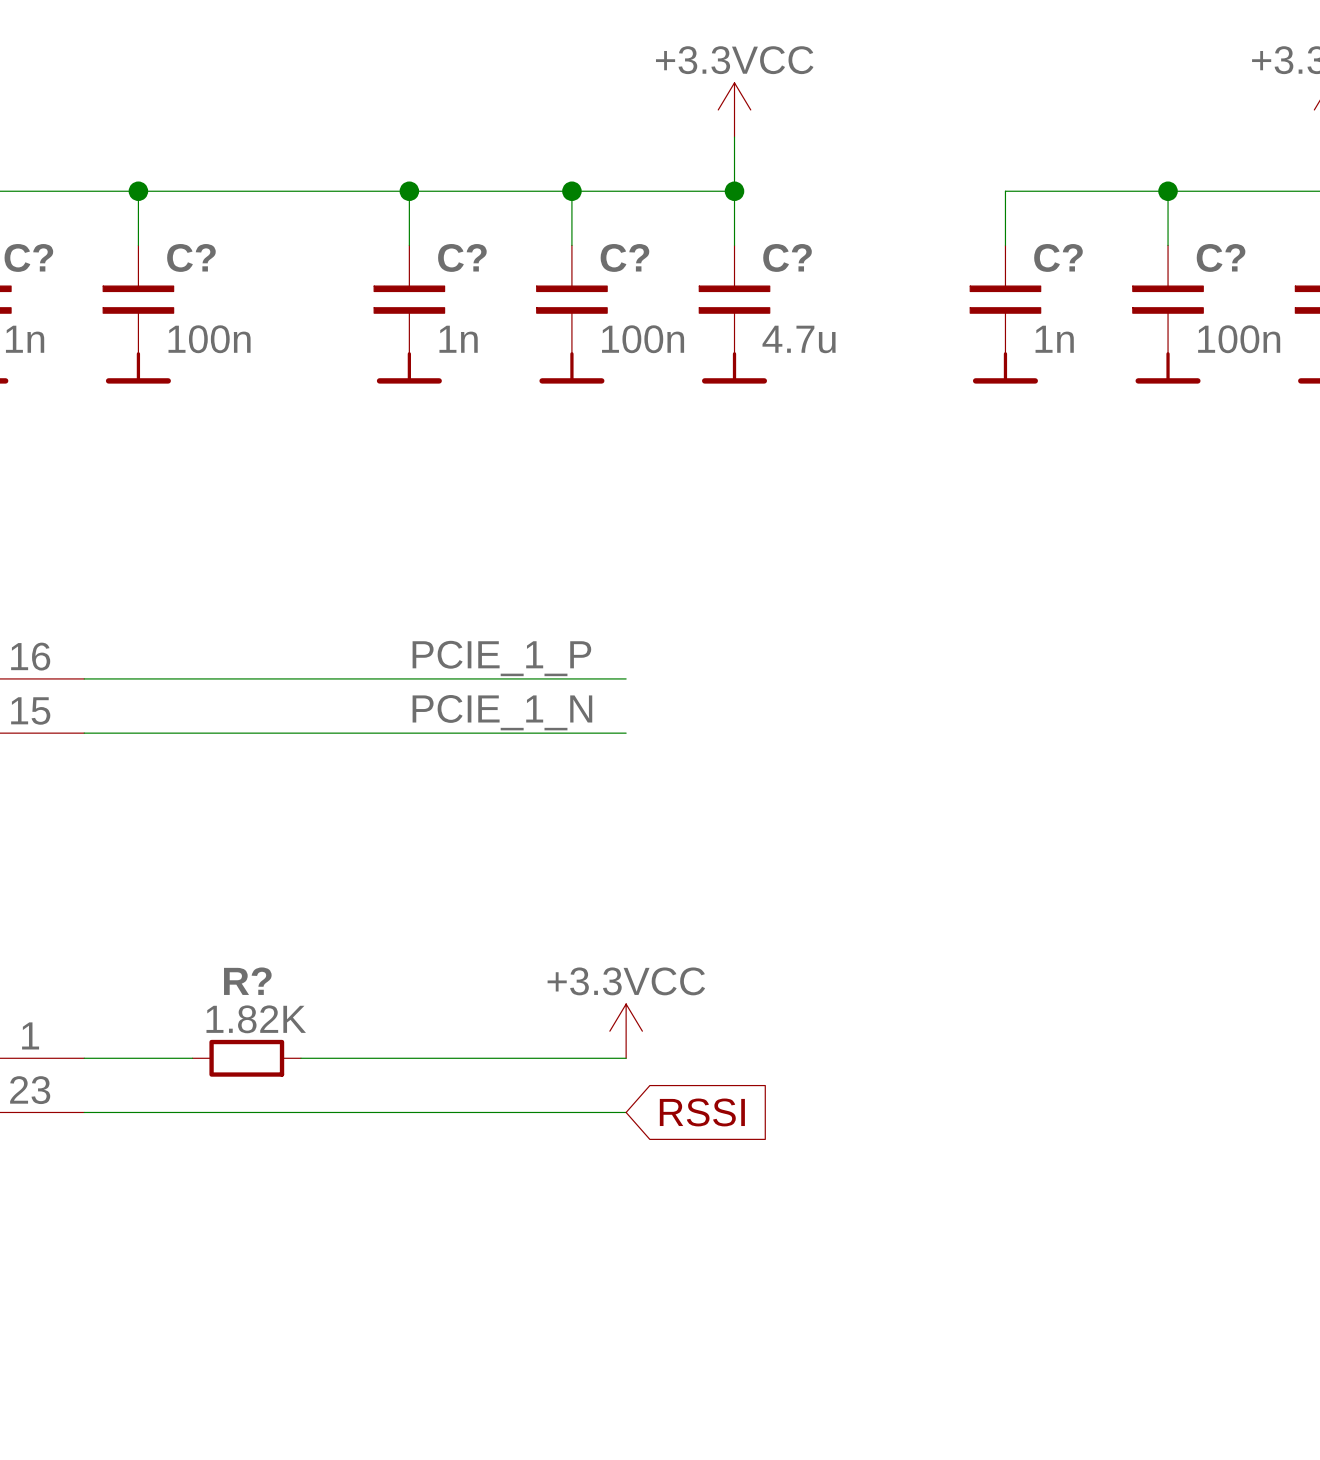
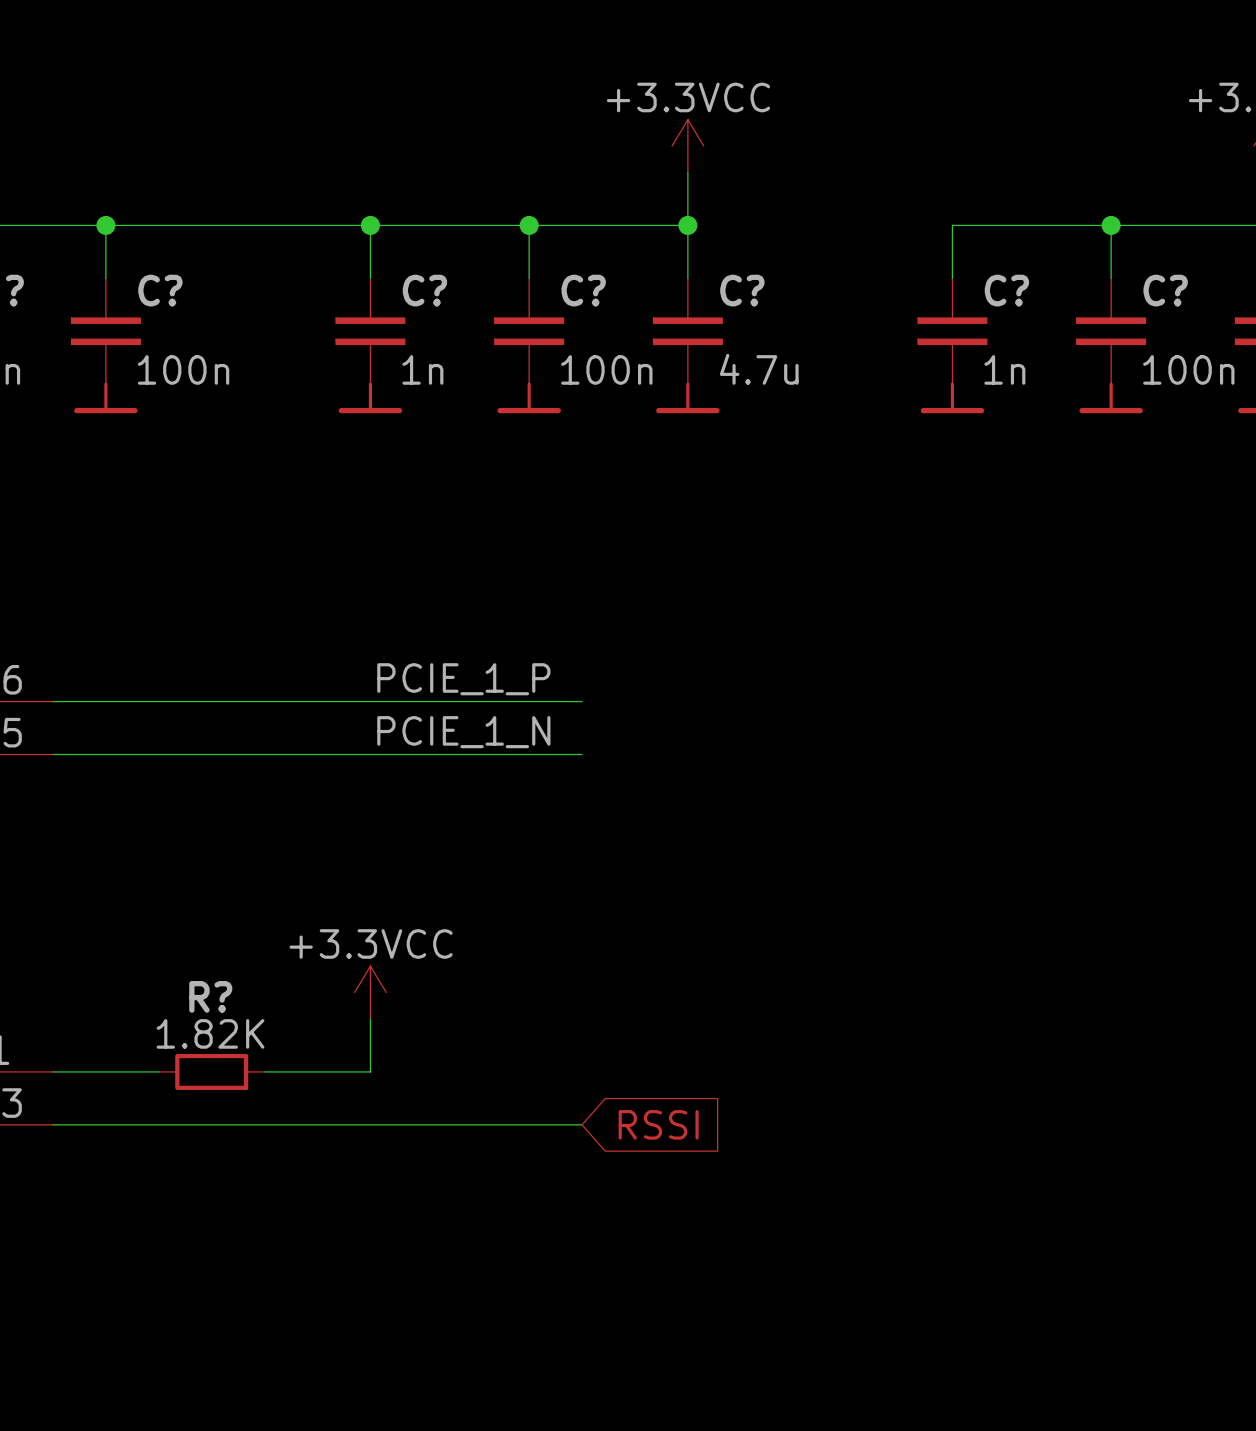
power symbol position: +3.3VCC (626, 1031) -> +3.3VCC (370, 992)
wire: (409, 1058) (626, 1058) -> (370, 1071) (370, 1019)

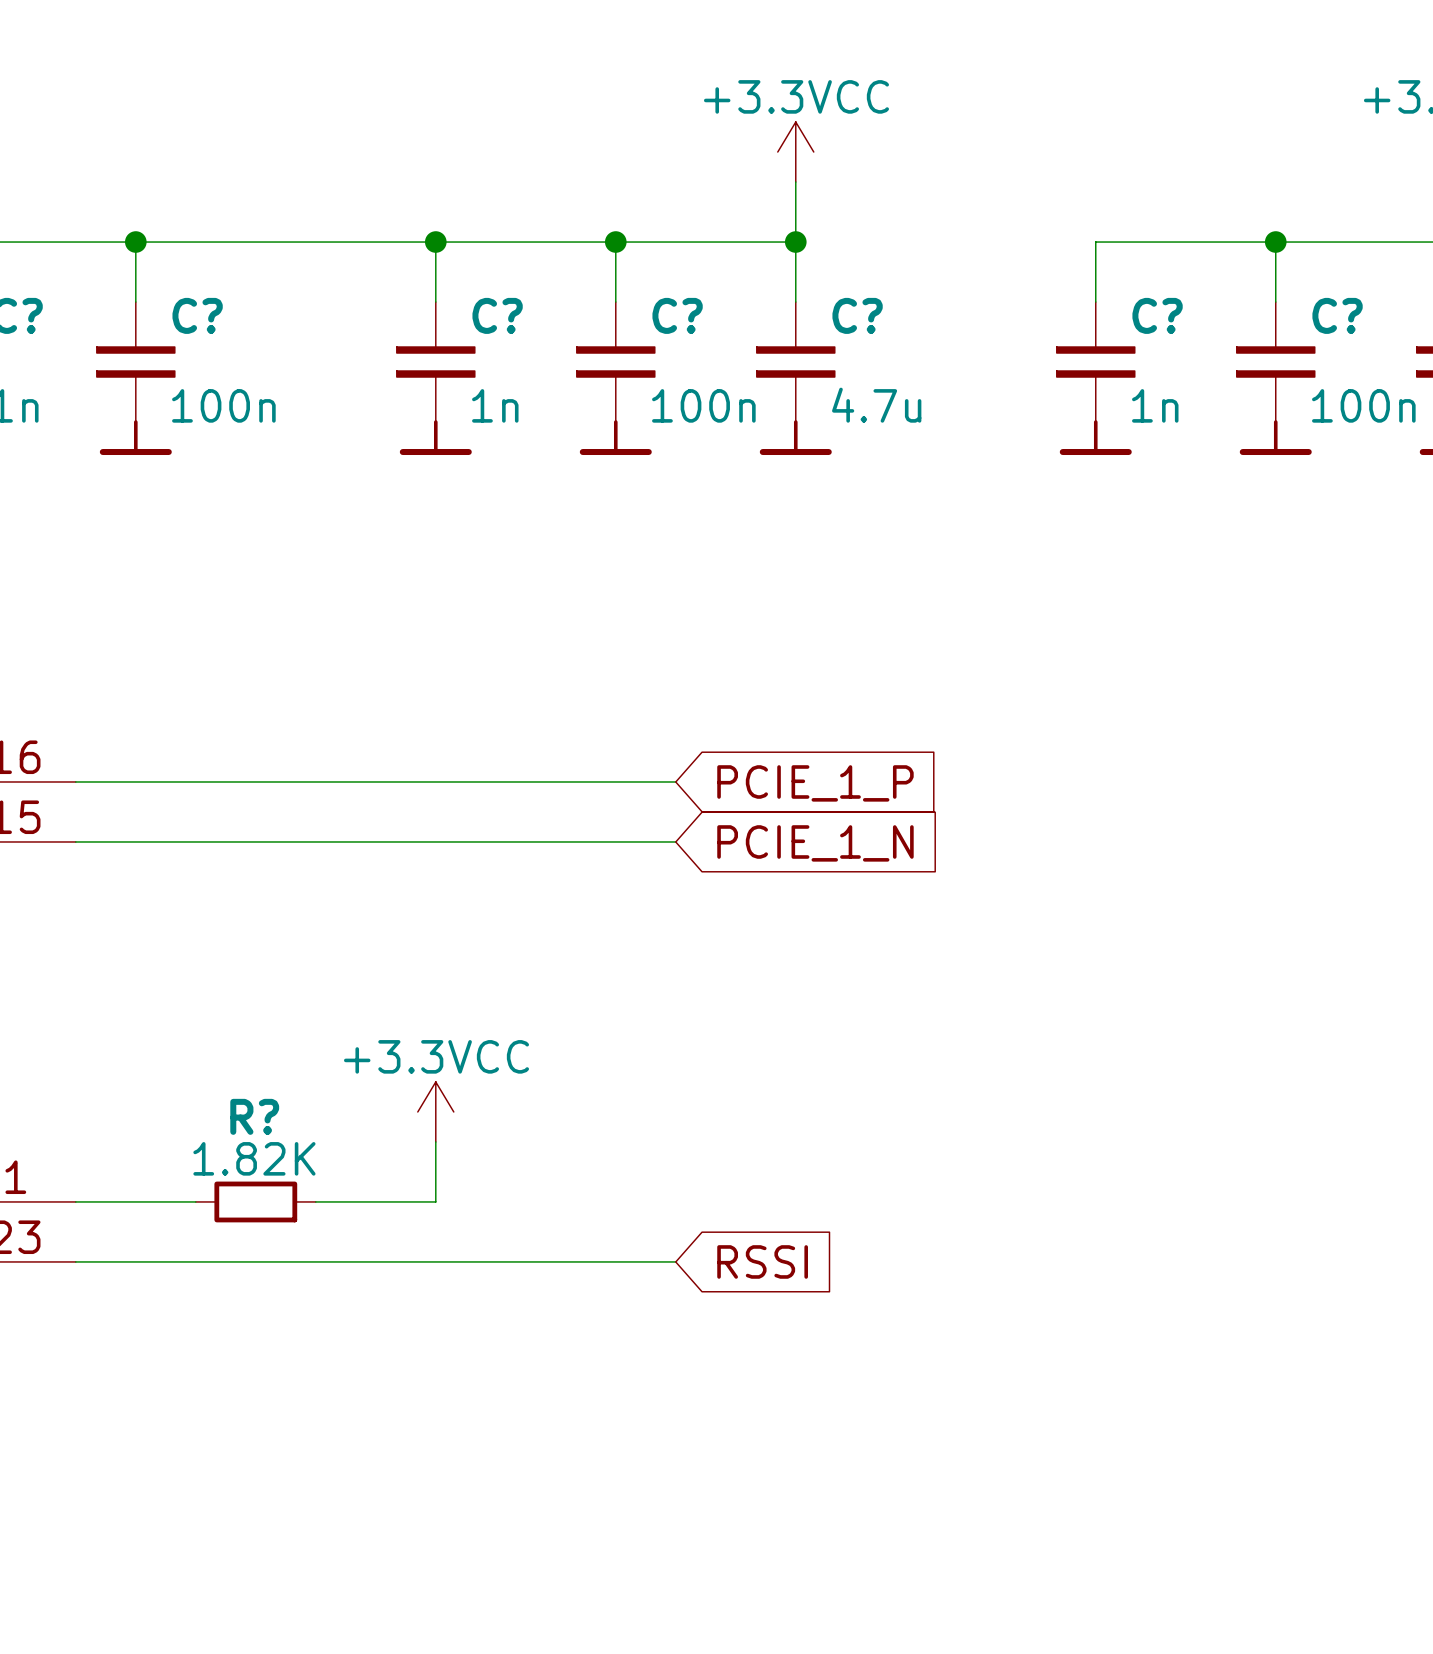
label: PCIE_1_P (463, 679) -> none
global label: none -> PCIE_1_P (815, 783)
label: PCIE_1_N (463, 732) -> none
global label: none -> PCIE_1_N (815, 843)

